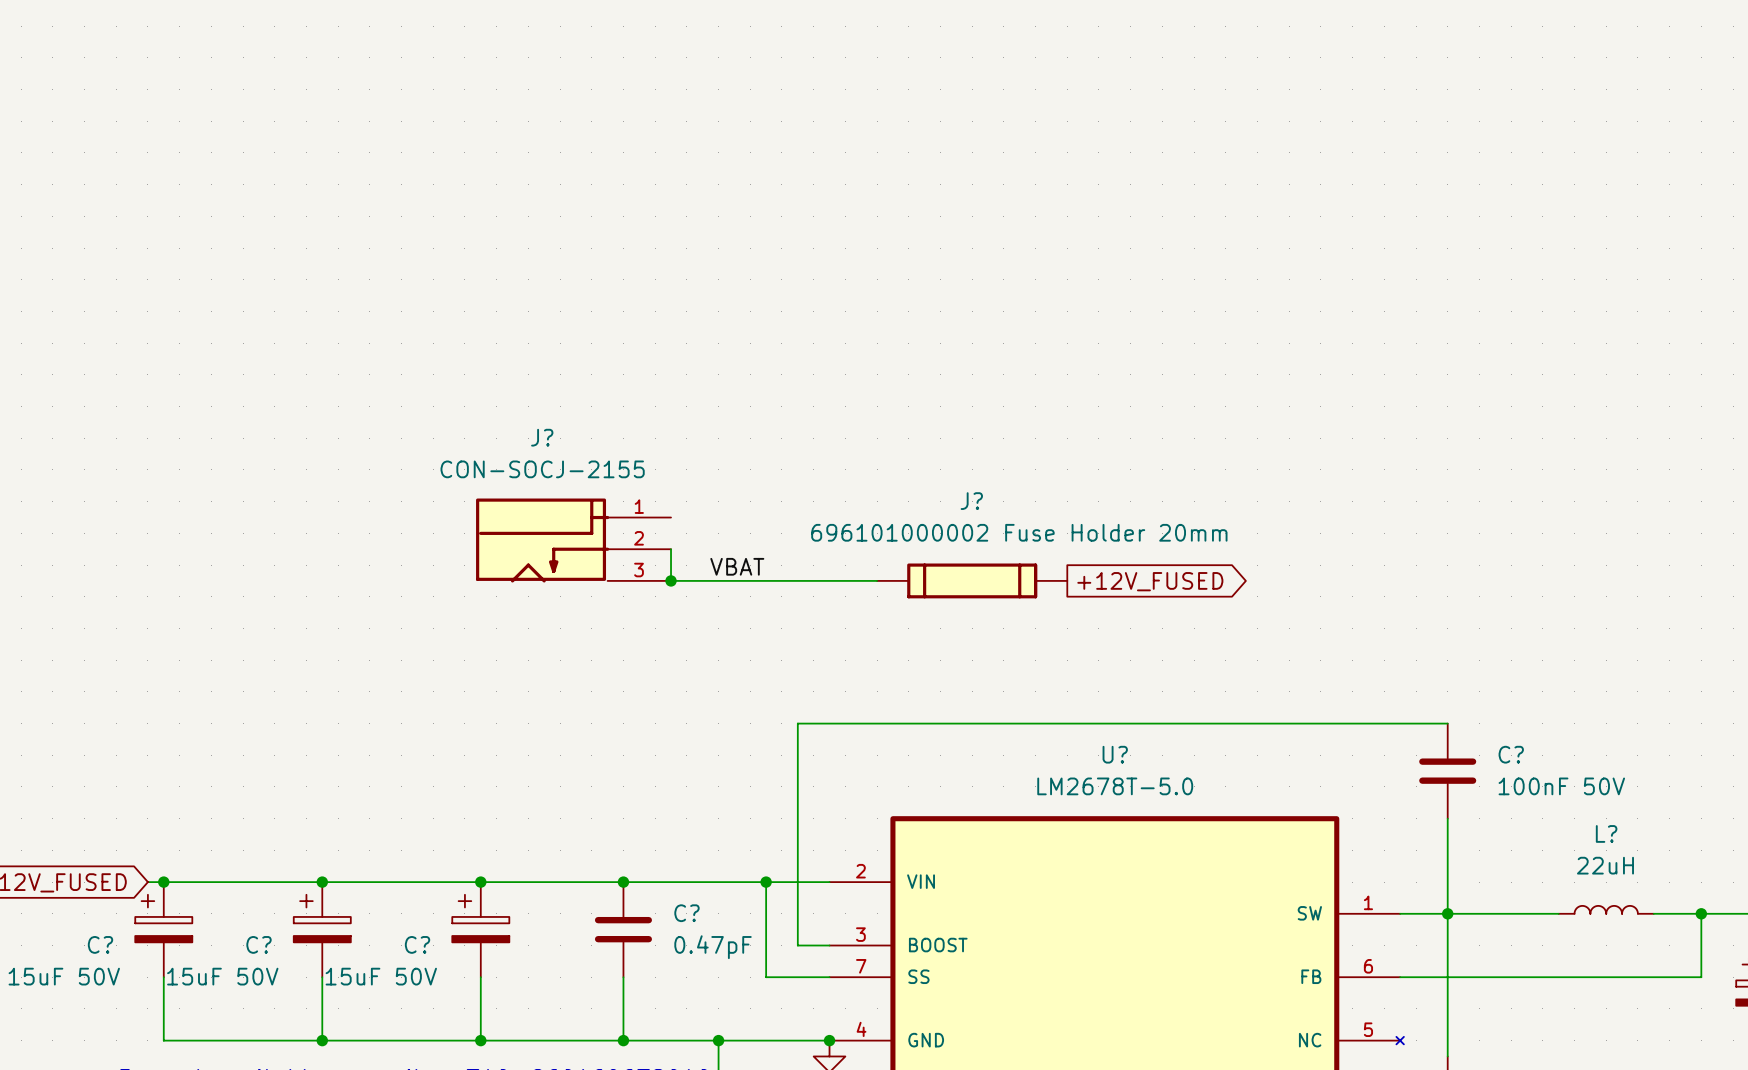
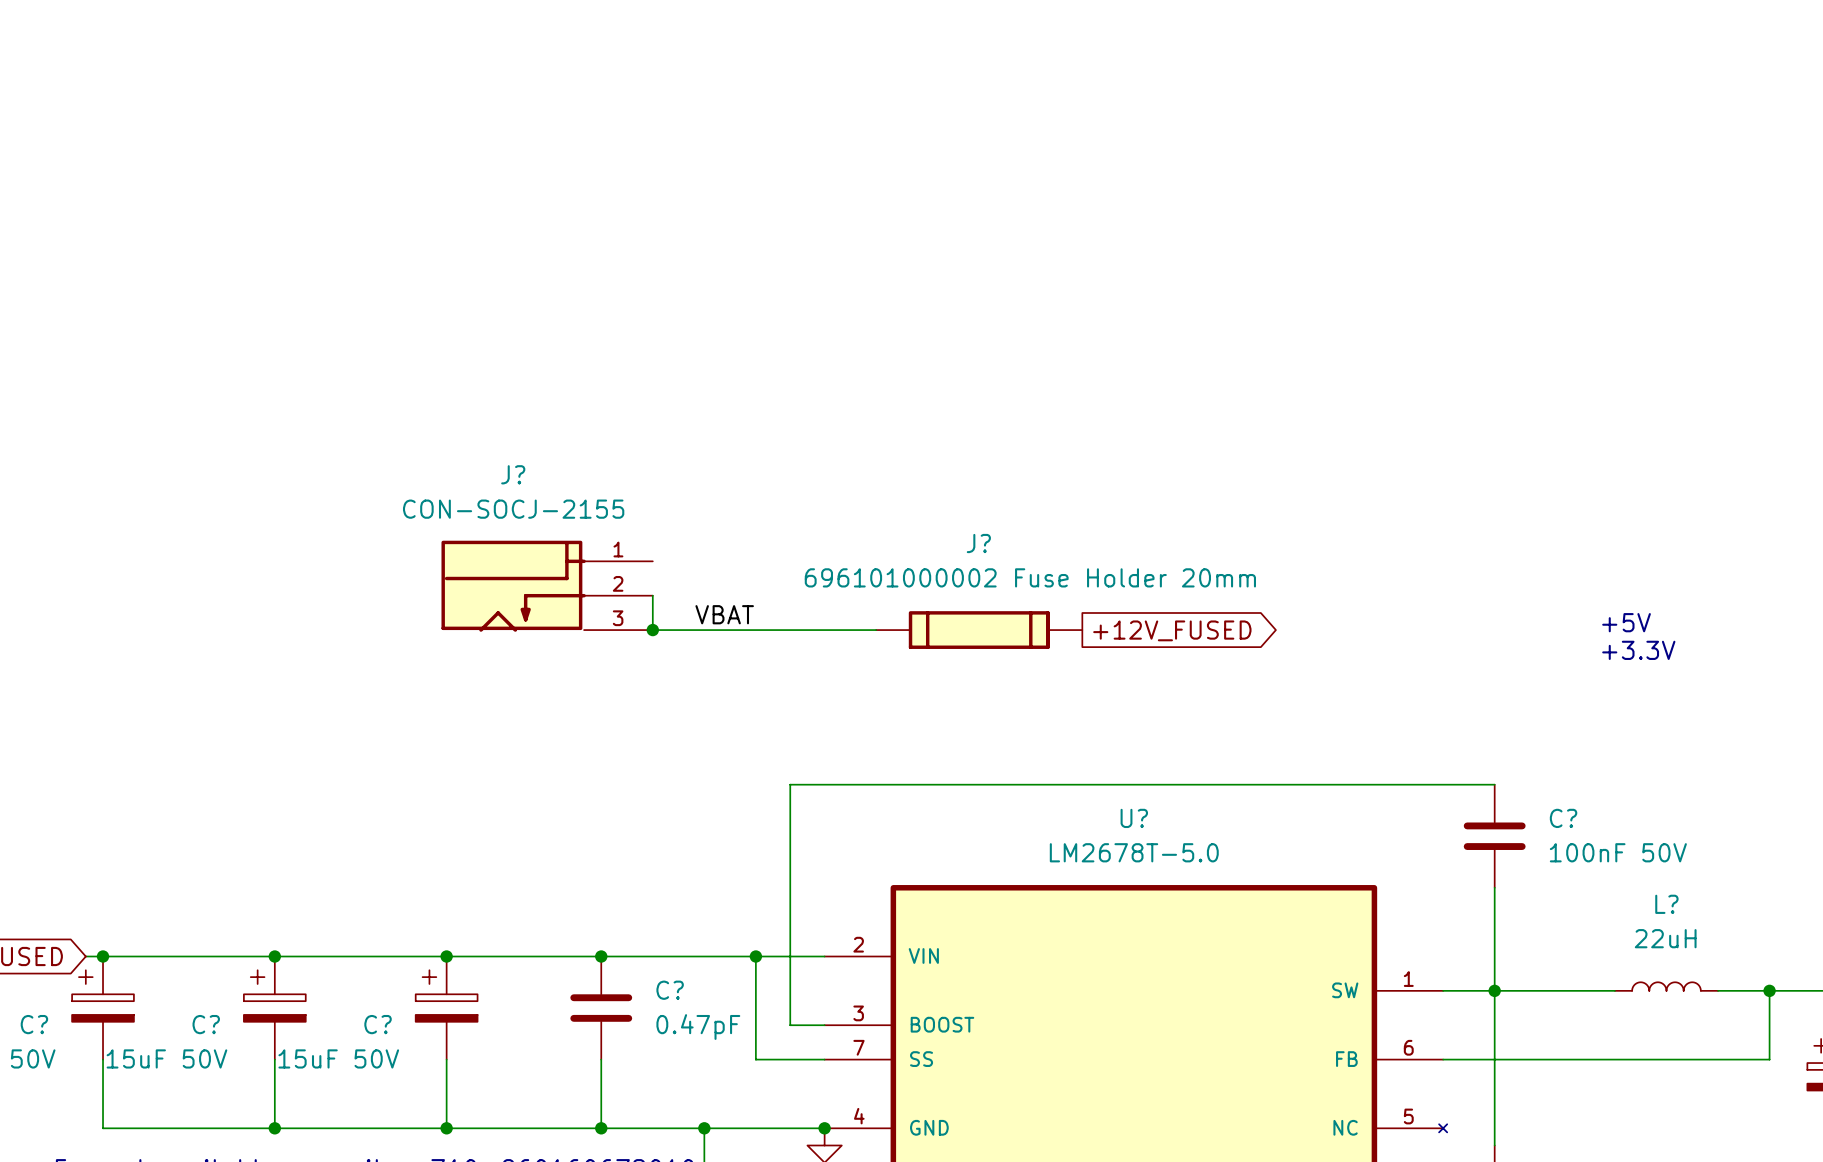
text: none -> +5V (1626, 622)
text: none -> +3.3V (1638, 650)

